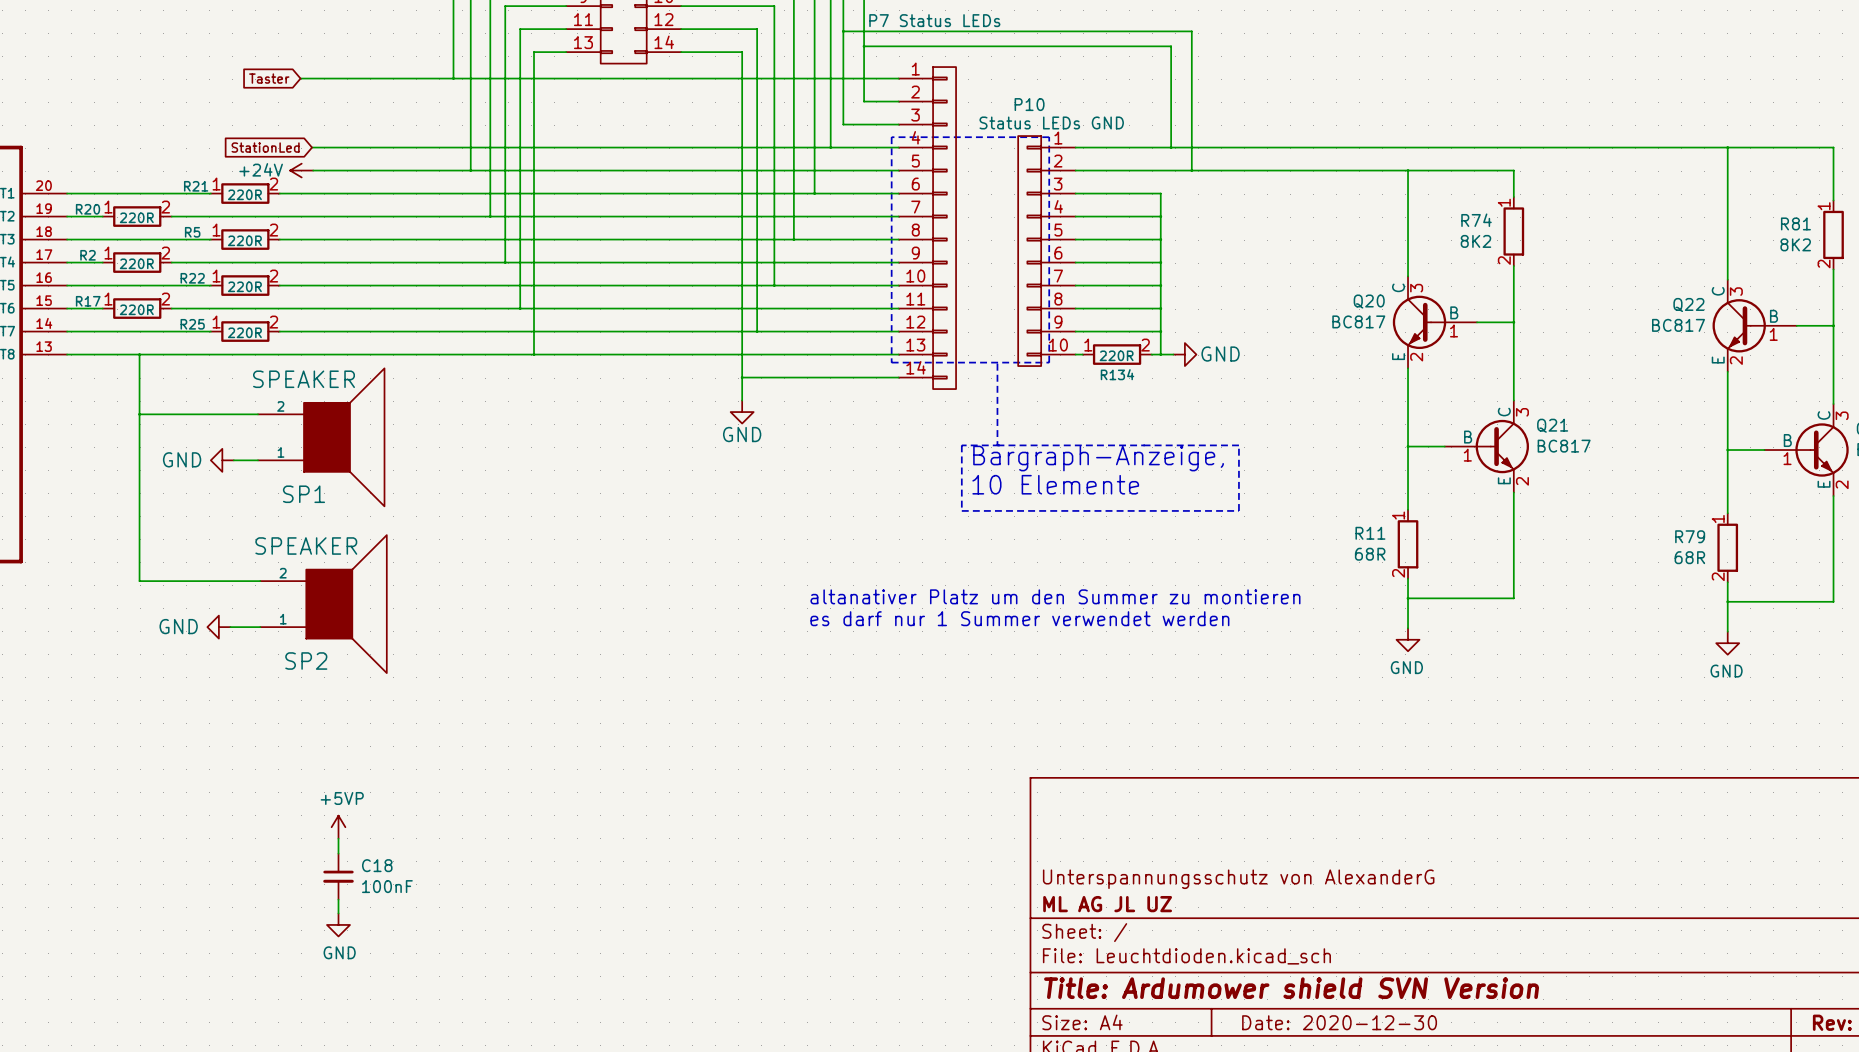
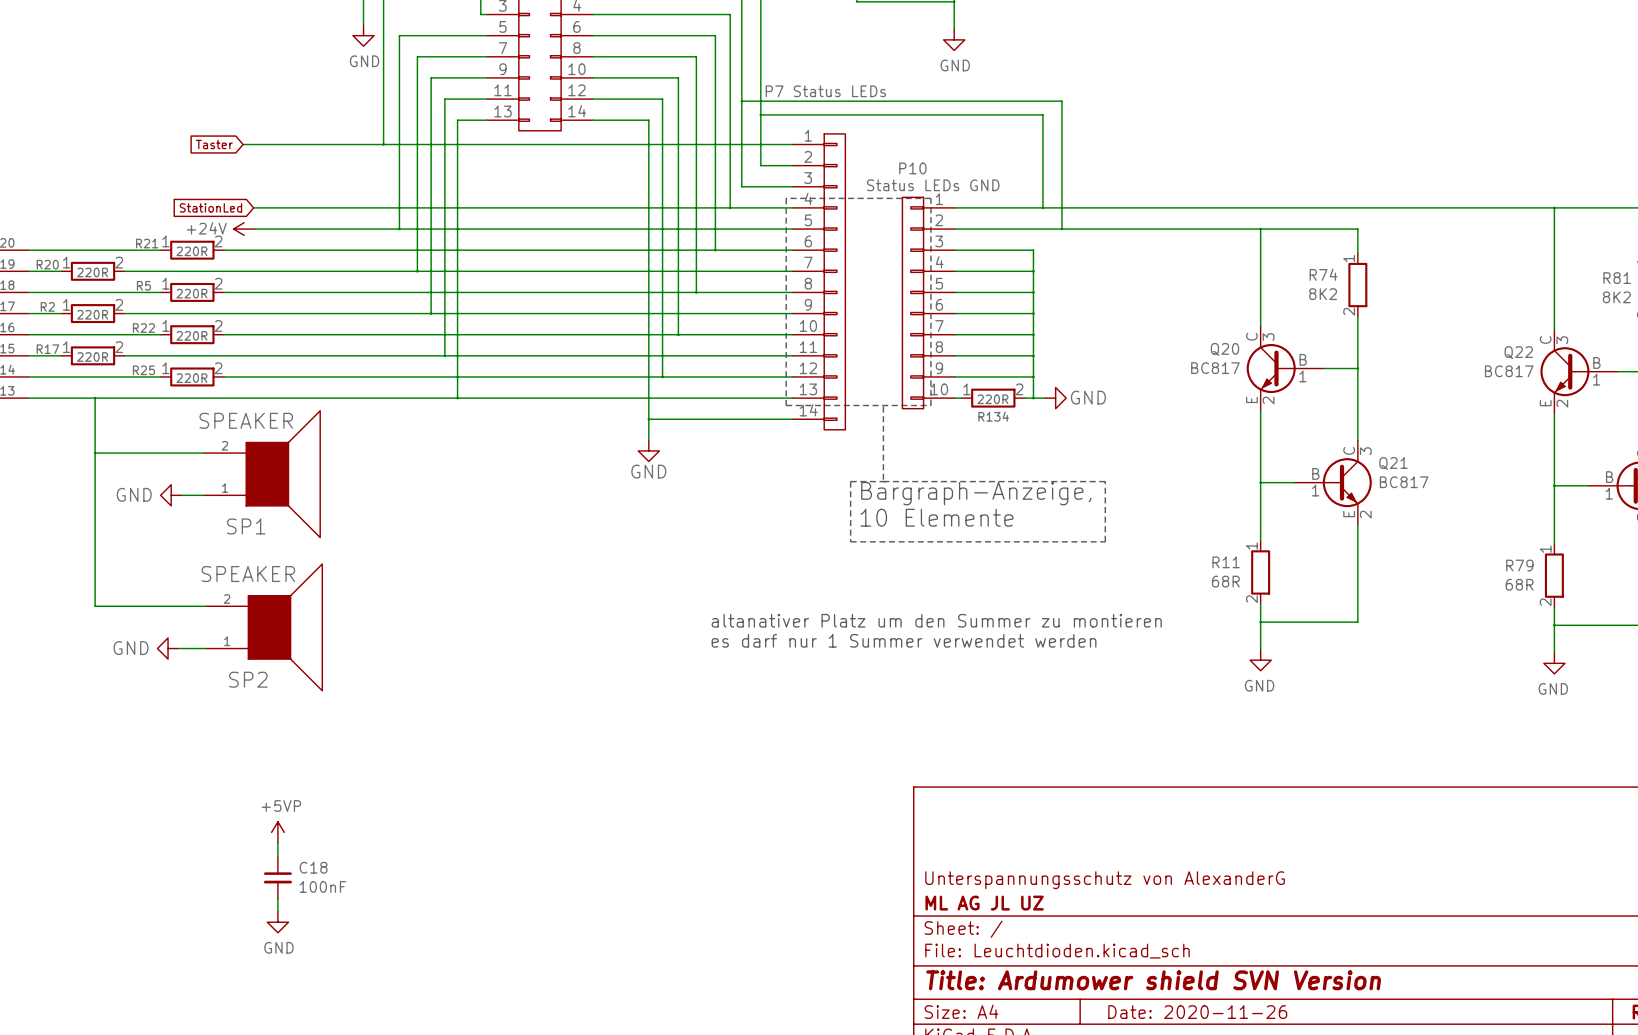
title block: Date: 2020-12-30 (1339, 1022) -> Date: 2020-11-26 (1197, 1012)

